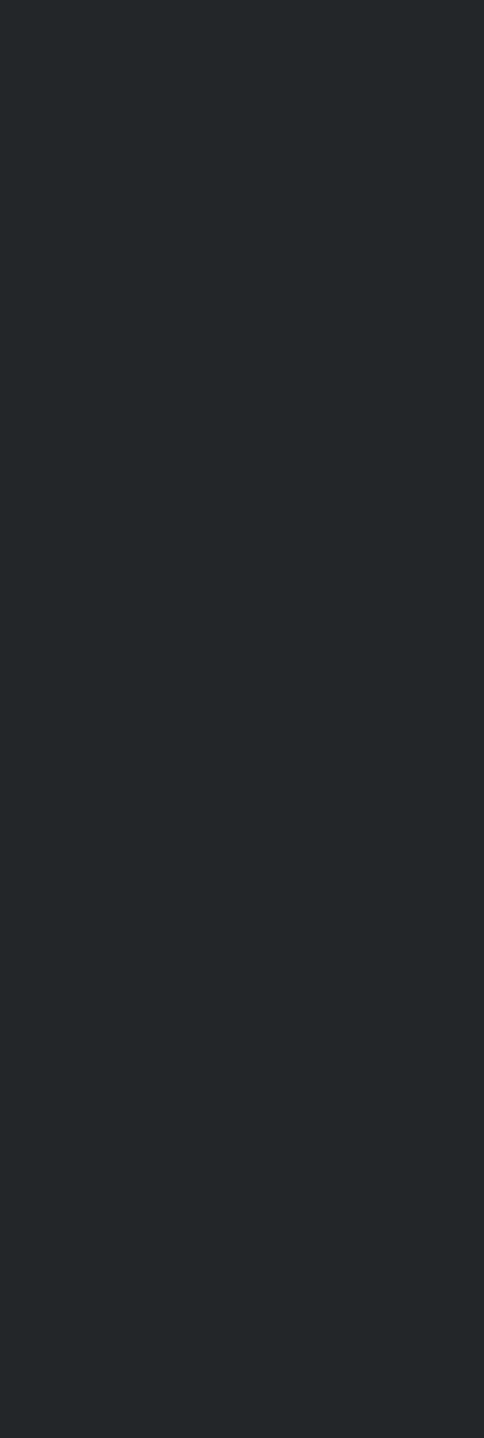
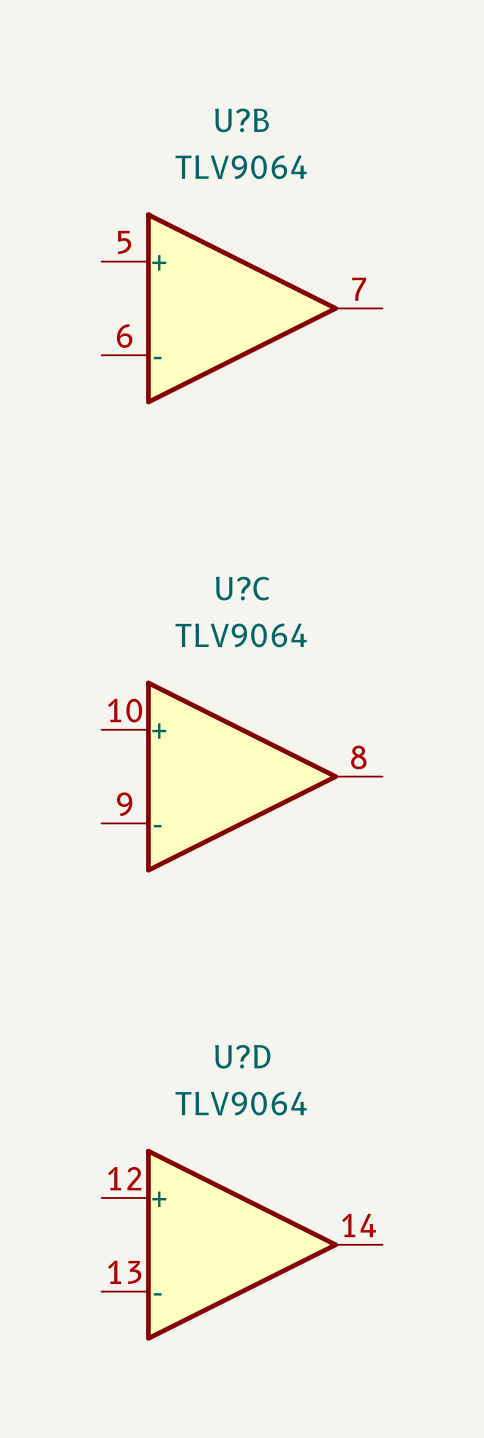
U?B: none -> TLV9064 (242, 308)
U?C: none -> TLV9064 (242, 776)
U?D: none -> TLV9064 (242, 1244)

